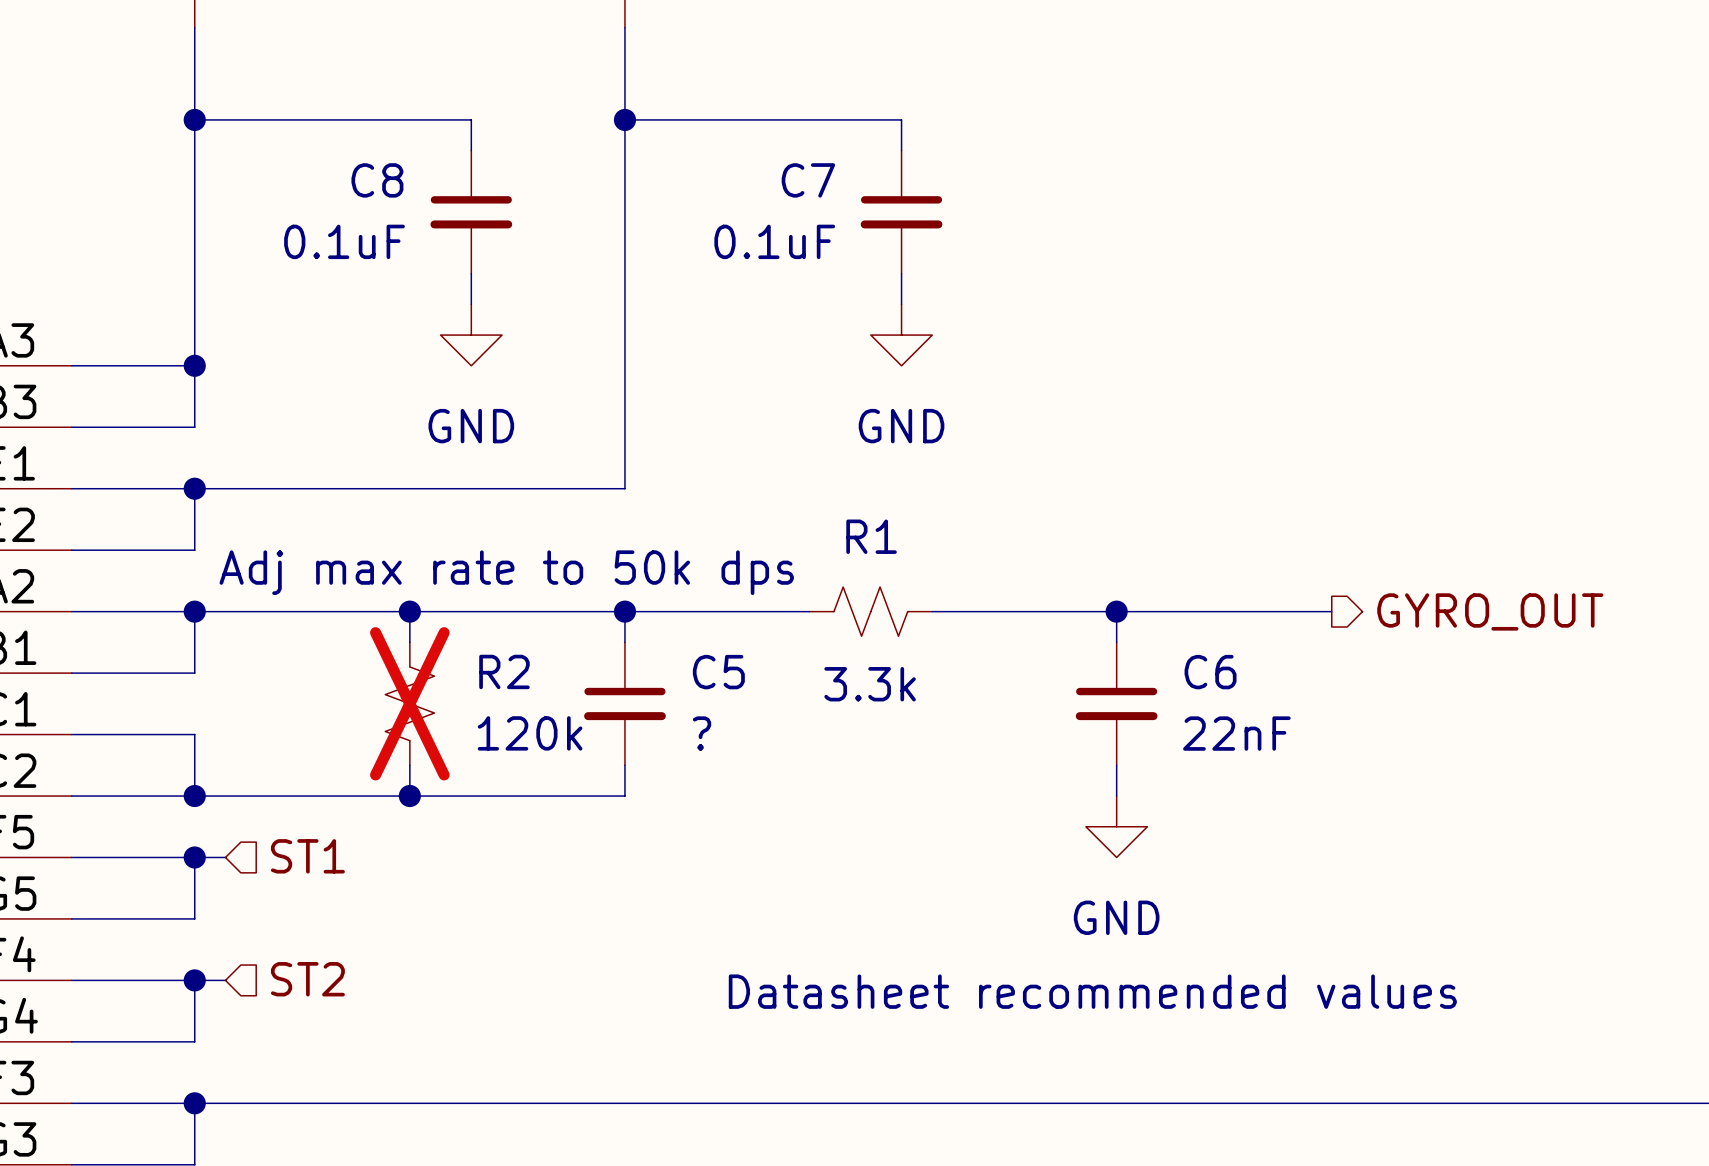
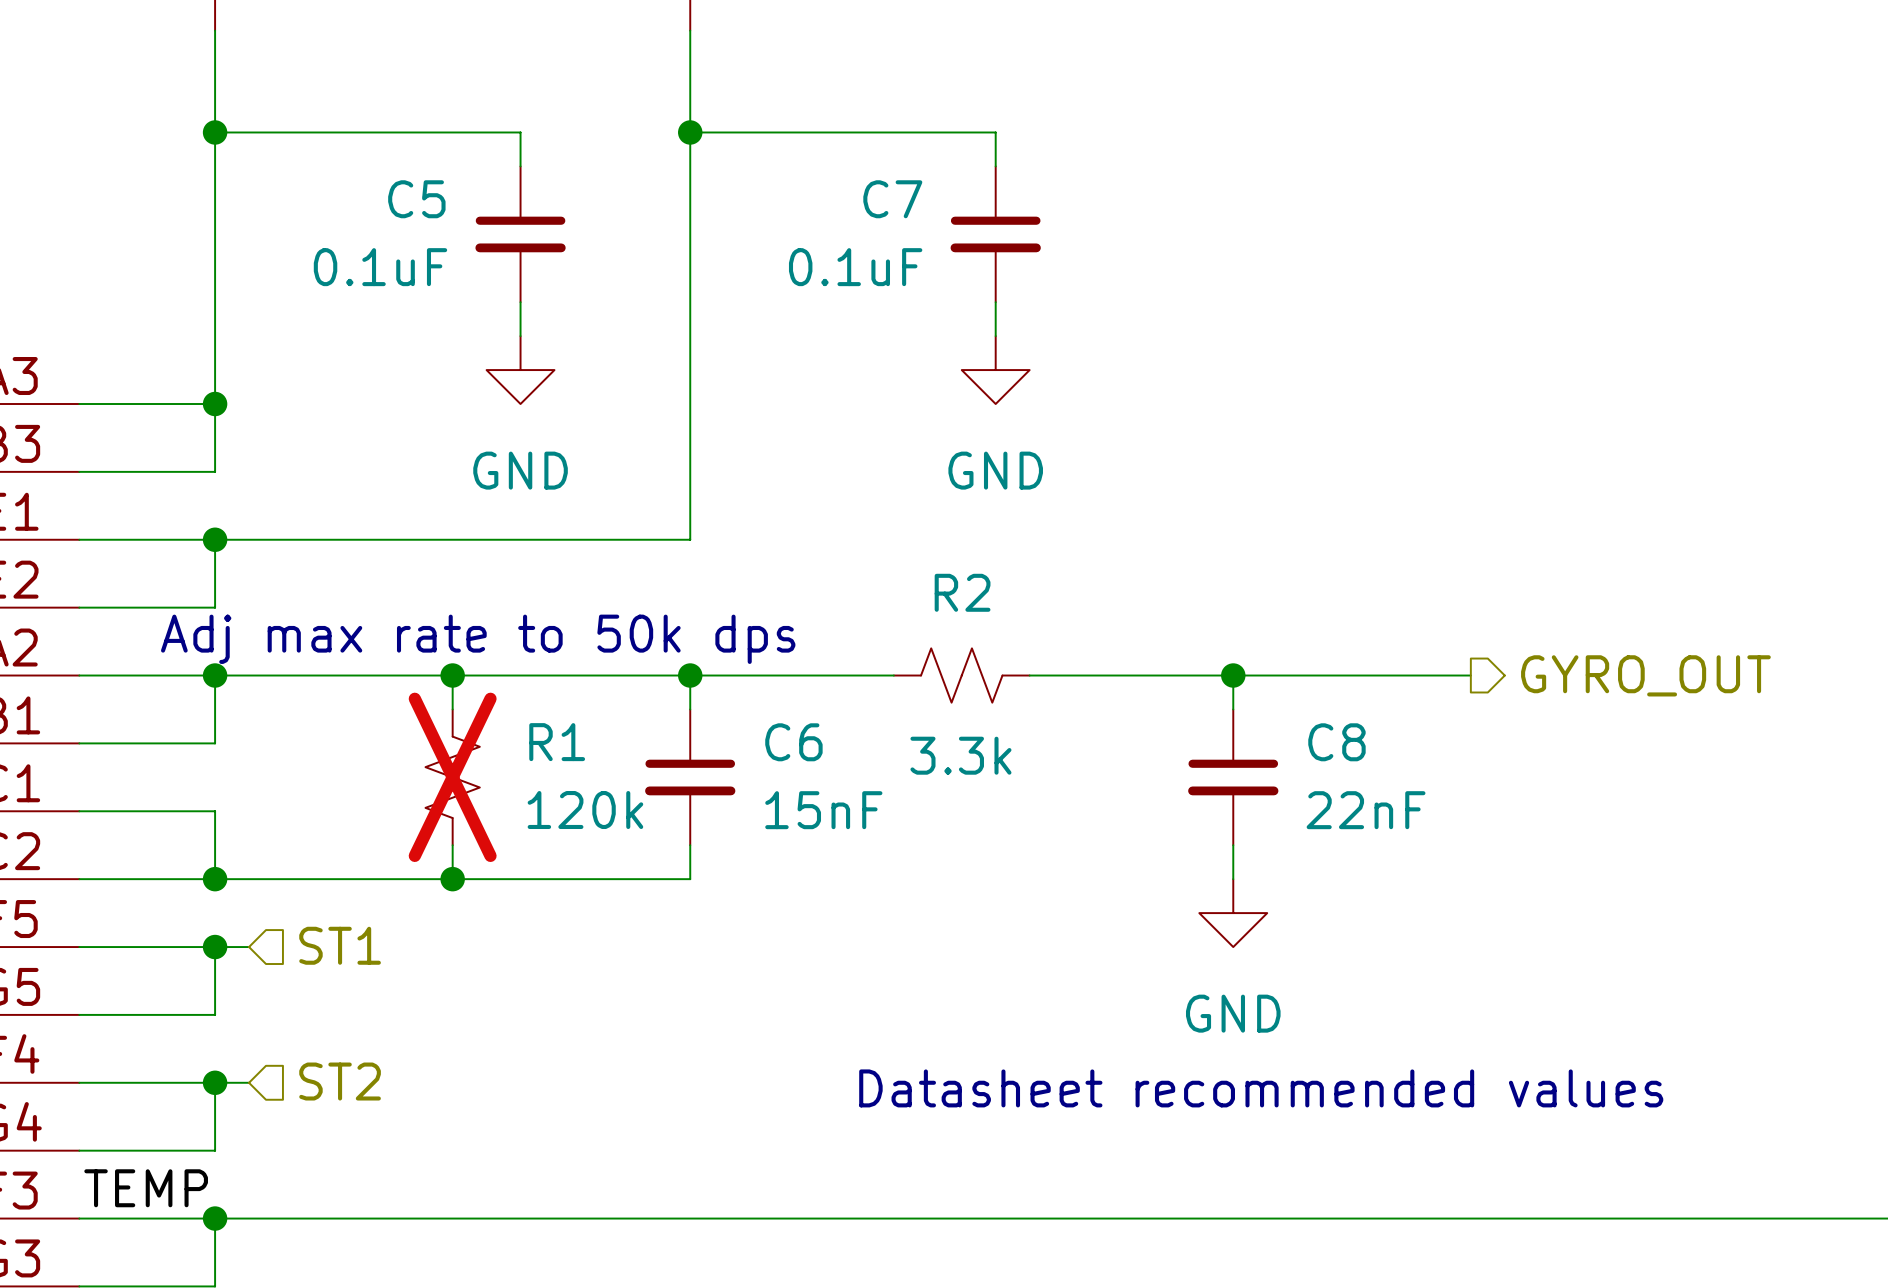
C8 name: C8 (377, 180) -> C5 (416, 199)
R1 name: R1 (871, 536) -> R2 (962, 592)
text position: Adj max rate to 50k dps (506, 572) -> Adj max rate to 50k dps (478, 639)
R2 name: R2 (504, 671) -> R1 (557, 742)
C5 name: C5 (718, 672) -> C6 (793, 742)
C6 name: C6 (1210, 672) -> C8 (1336, 742)
C5 value: ? (702, 733) -> 15nF (823, 810)
text position: Datasheet recommended values (1092, 991) -> Datasheet recommended values (1261, 1088)
label: none -> TEMP (146, 1188)

